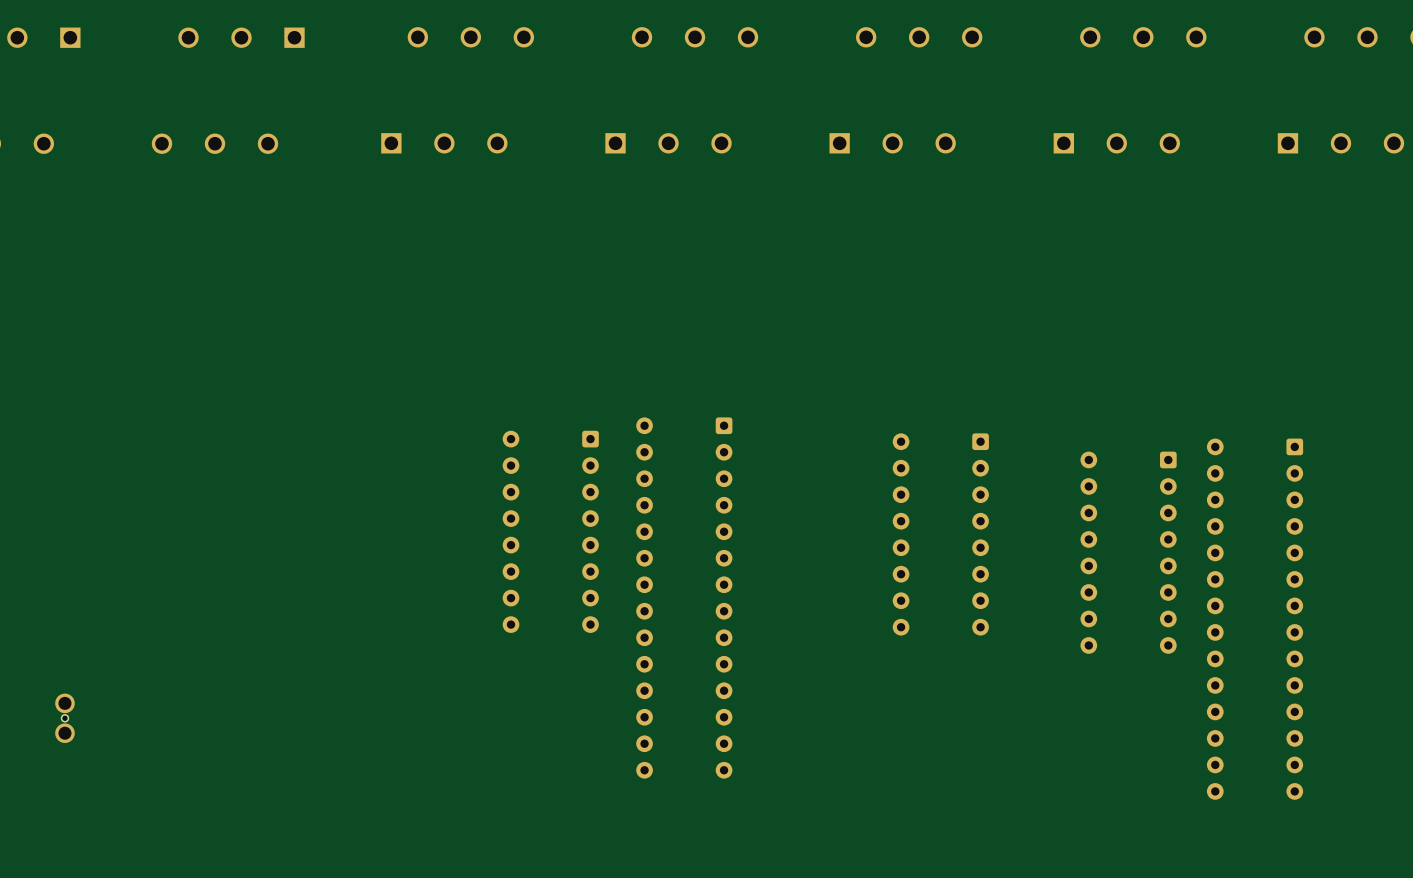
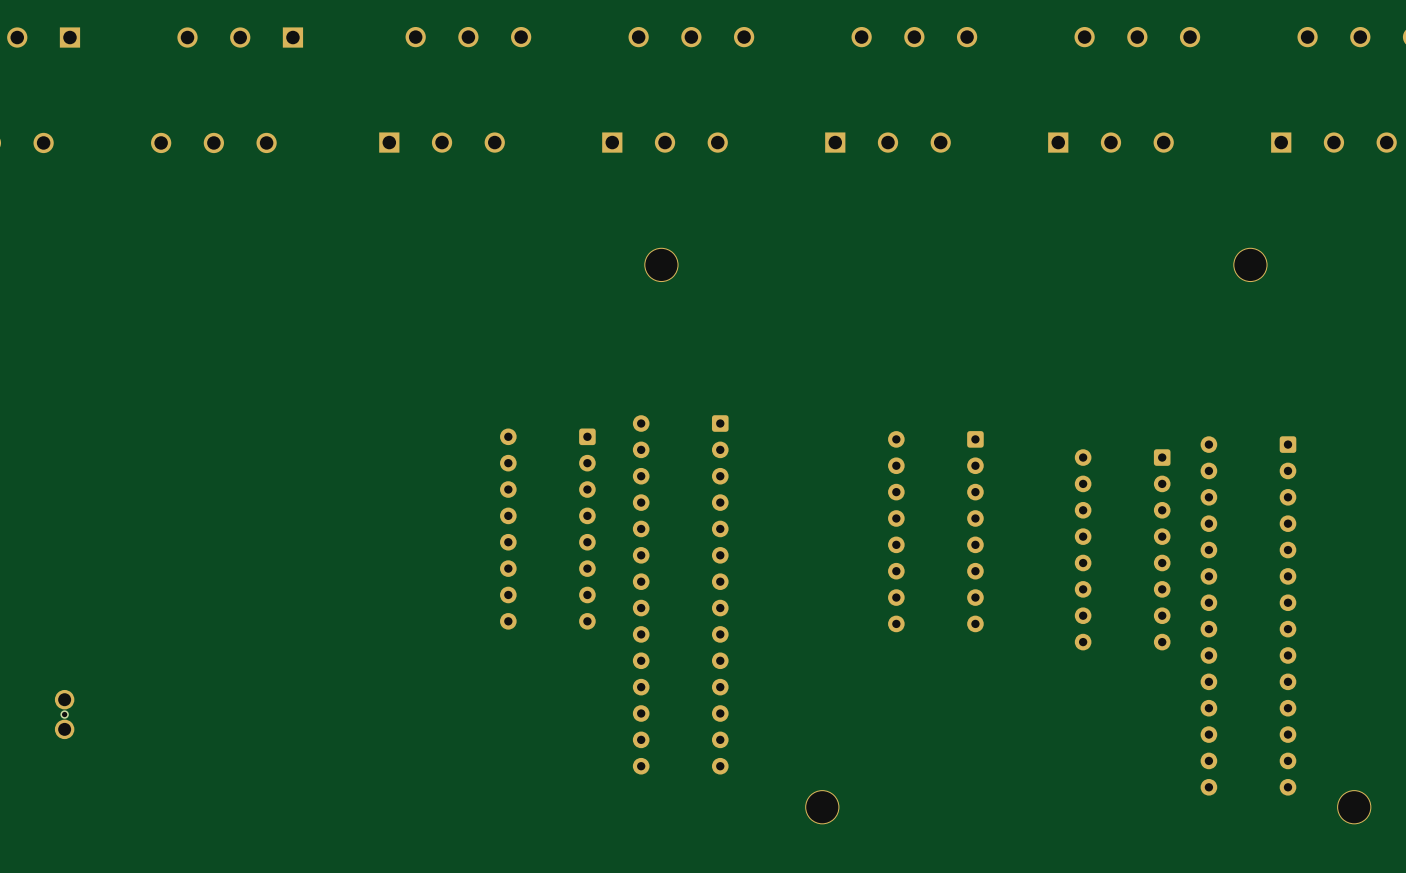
part: none -> (661, 264)
part: none -> (1250, 264)
part: none -> (822, 807)
part: none -> (1354, 807)

